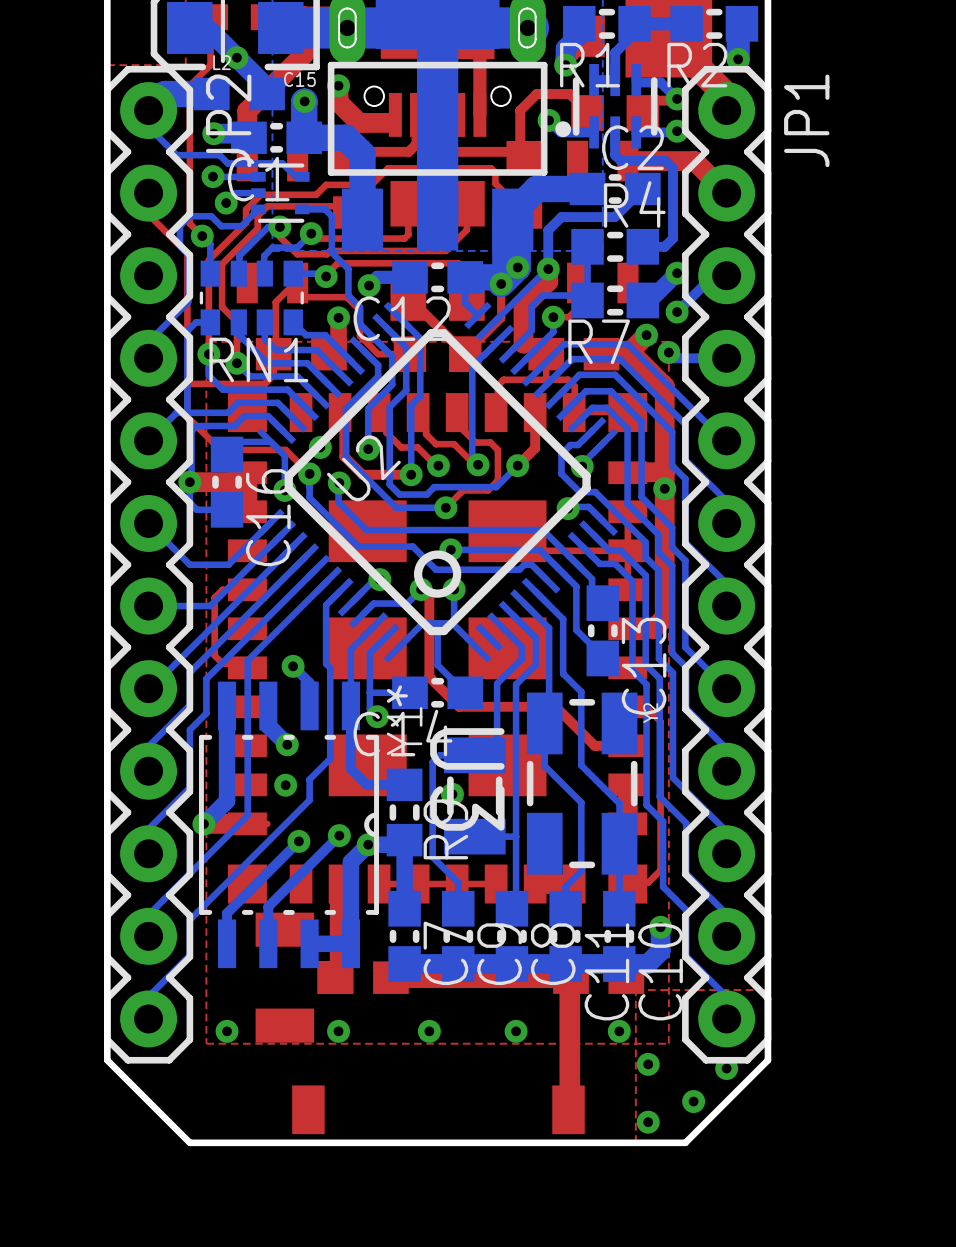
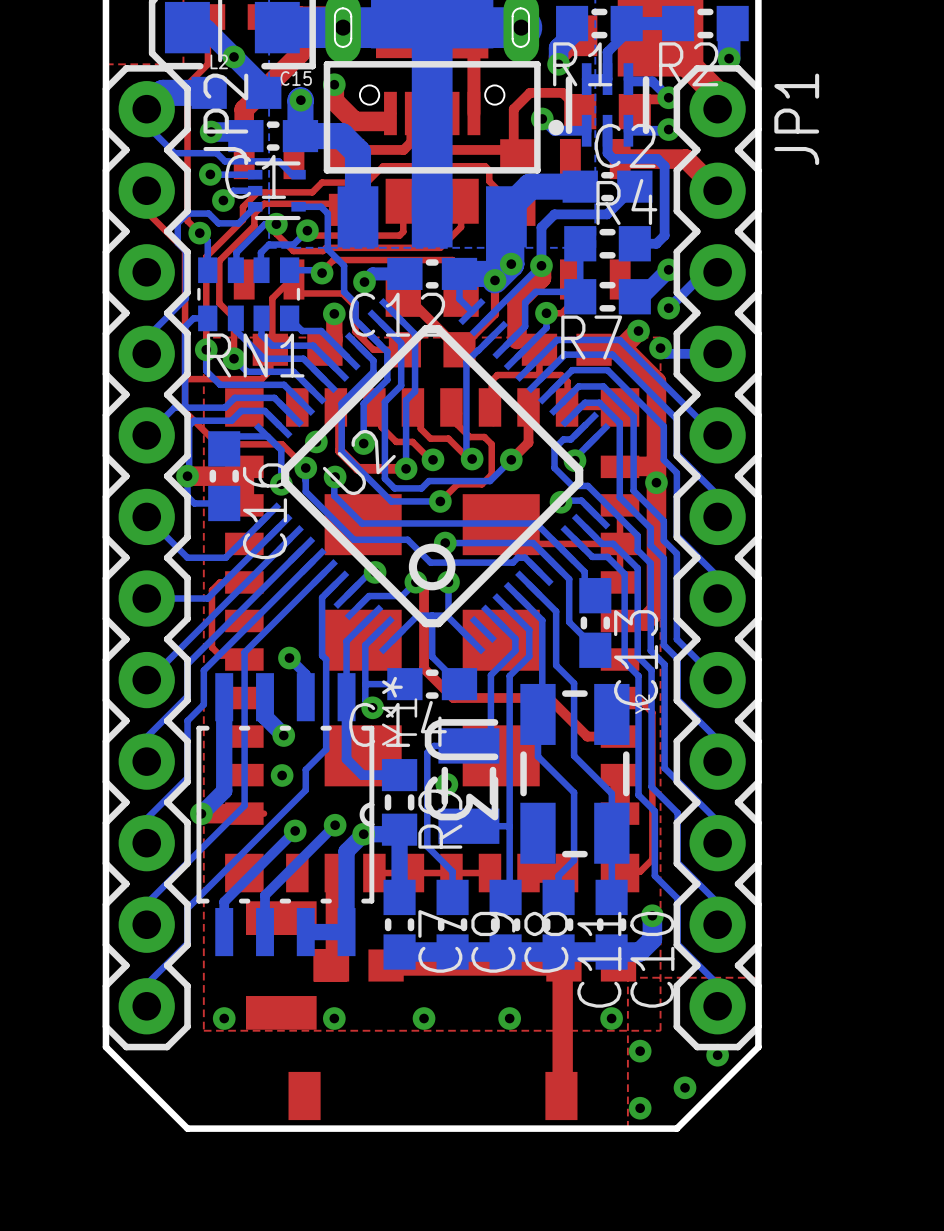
part footprint: [255, 912, 352, 1043] -> [245, 901, 348, 1030]

